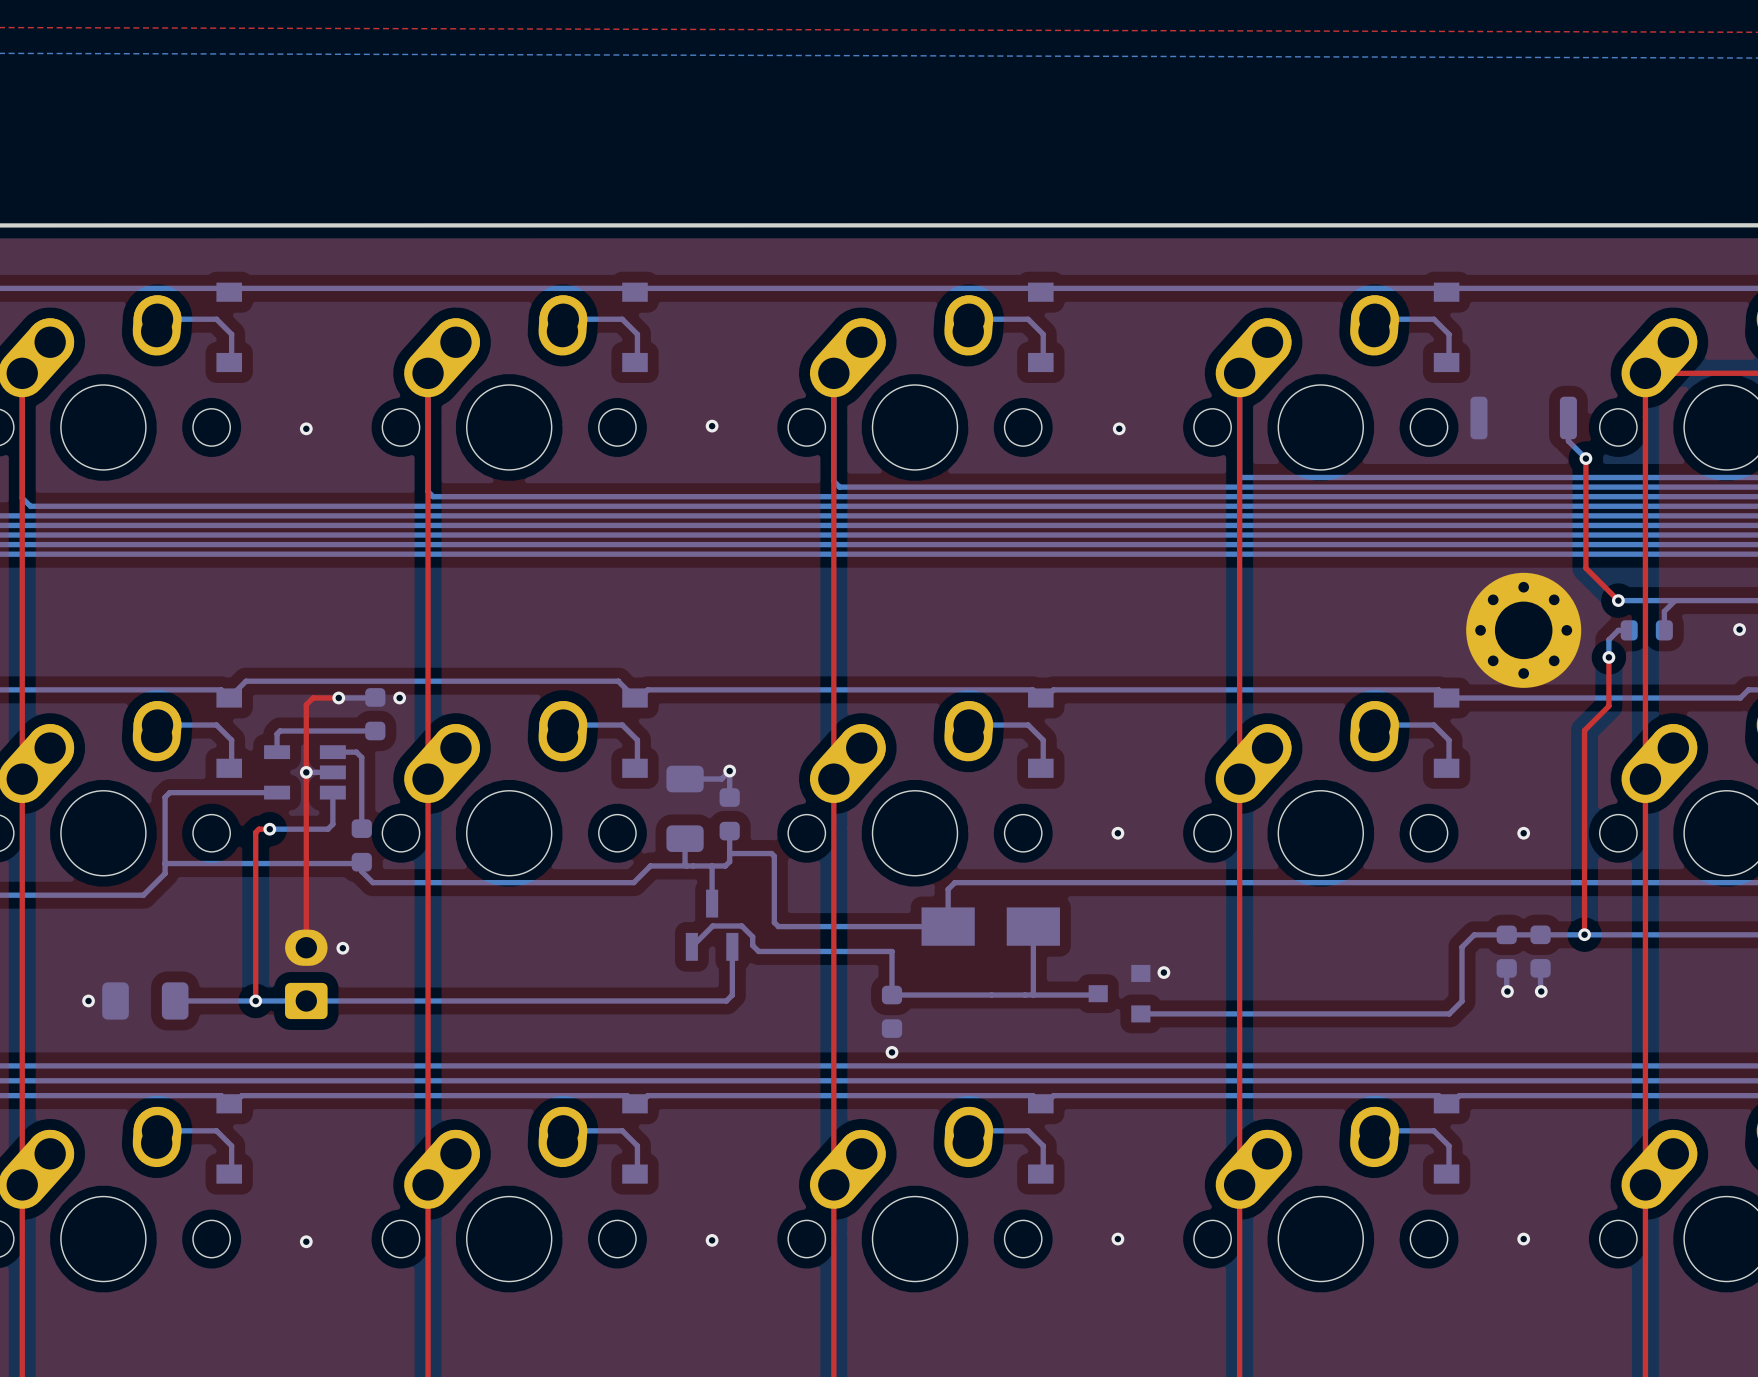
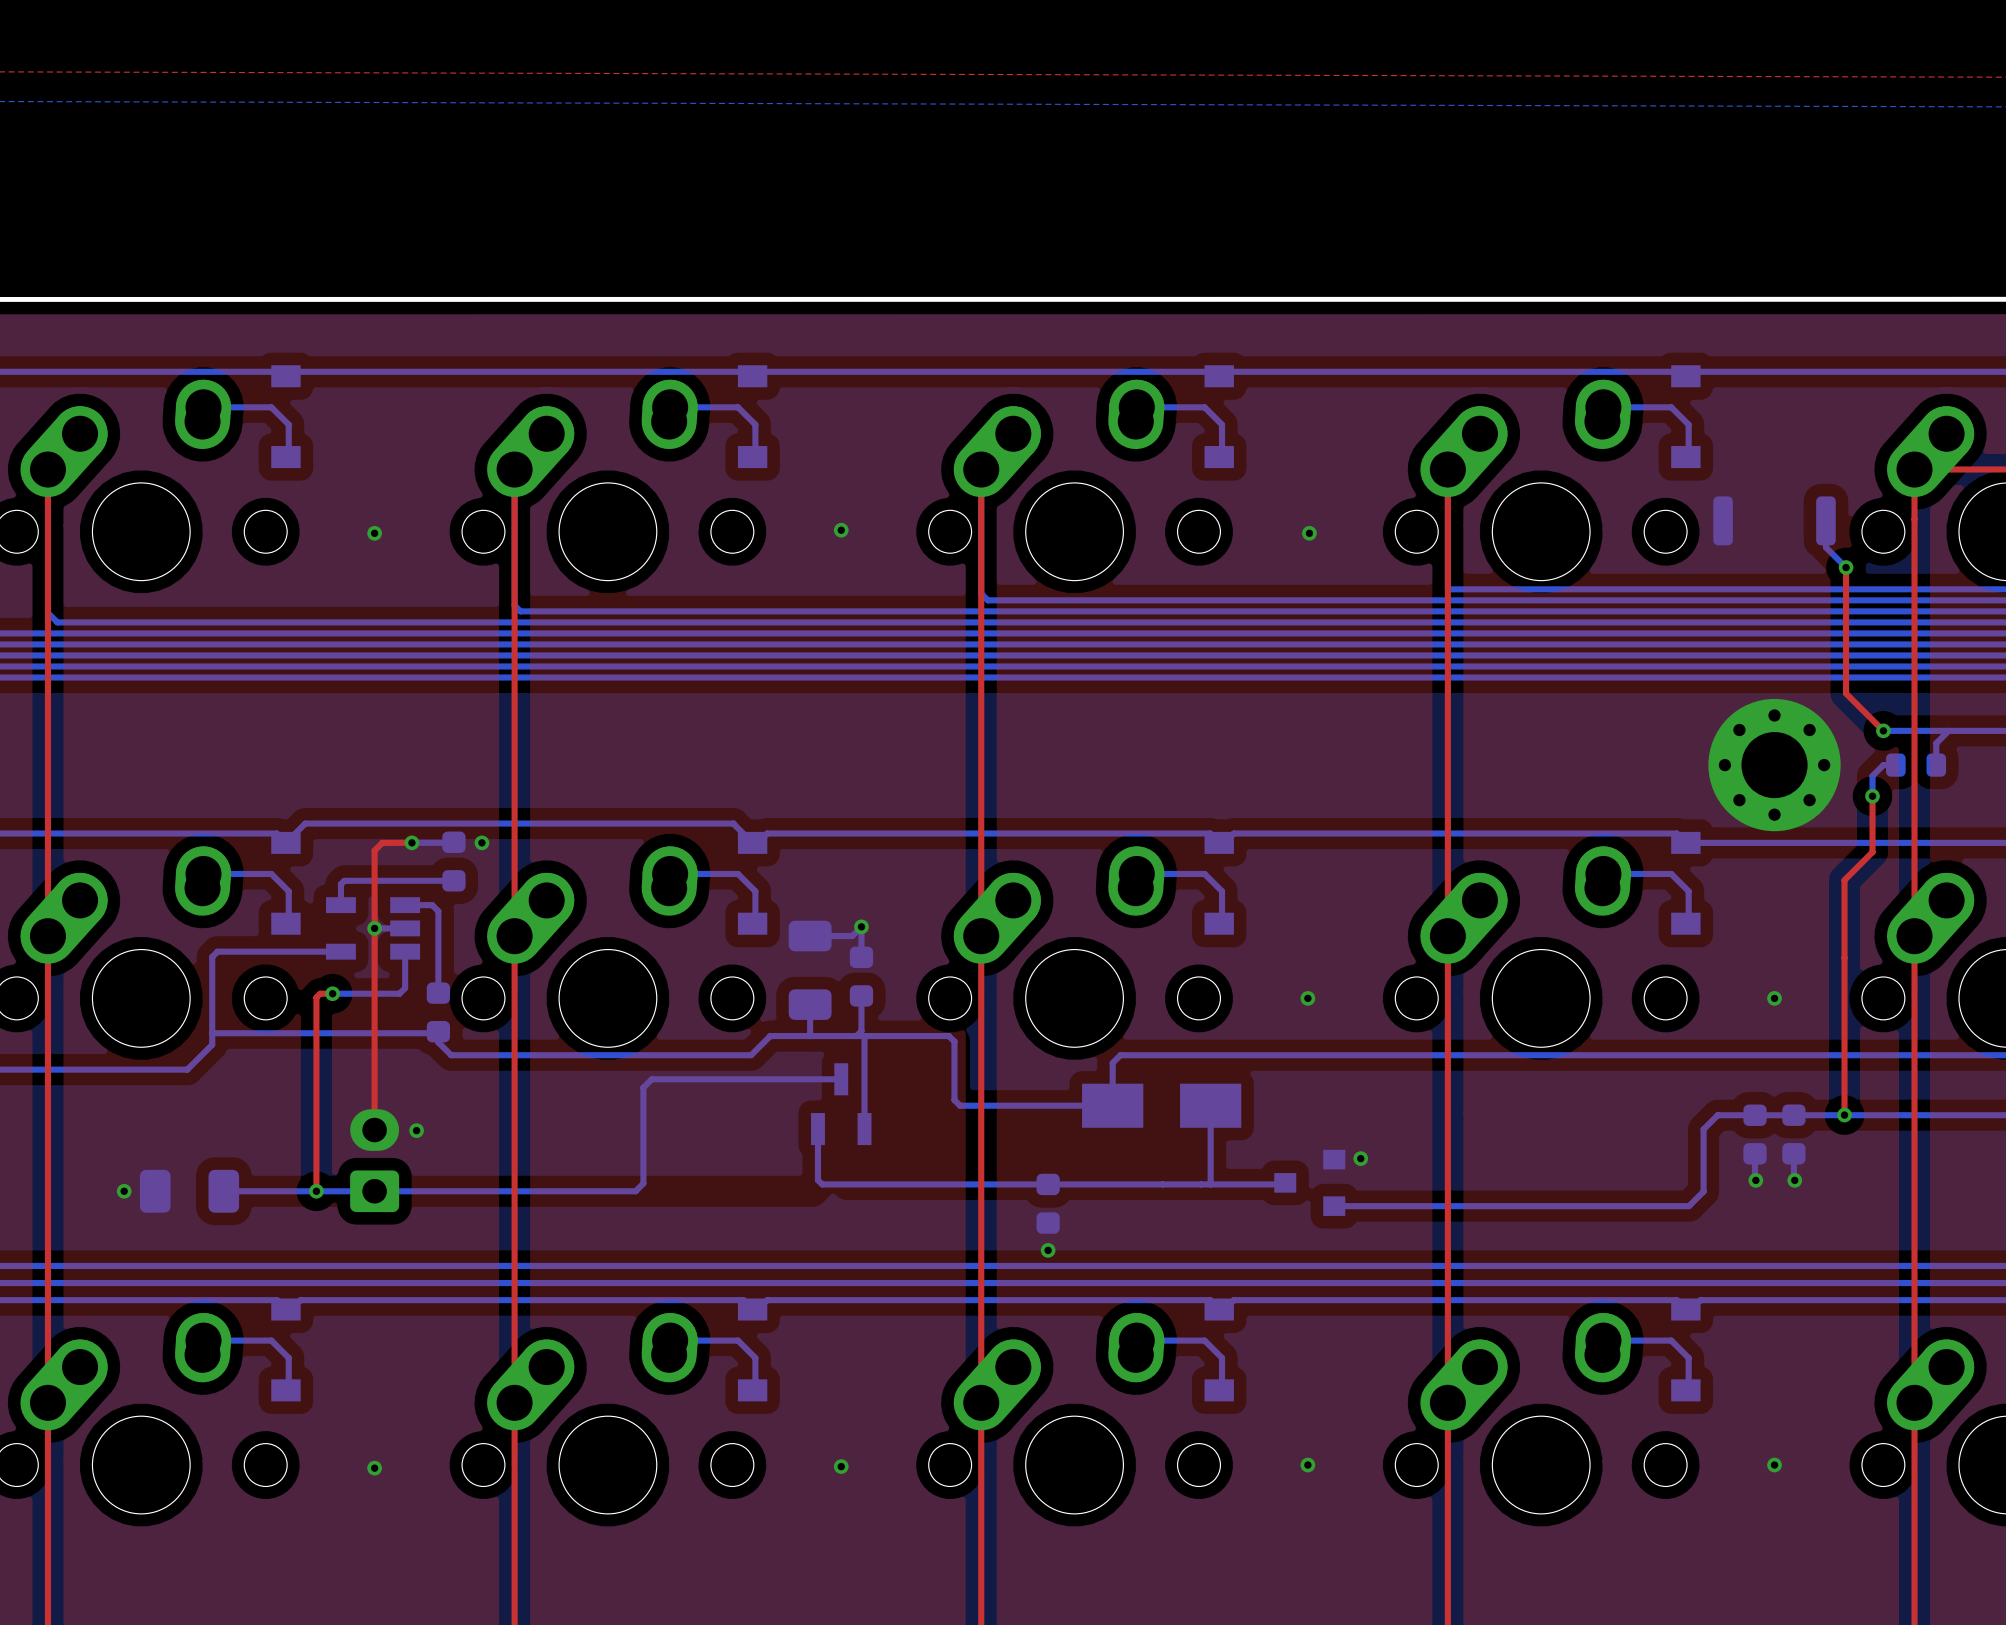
bottom track: (729, 853) (771, 853) (774, 856) (774, 922) (778, 926) (815, 926) -> (856, 1036) (948, 1036) (954, 1041) (954, 1100) (960, 1105)
bottom track: (712, 865) (712, 903) -> none
bottom track: none -> (864, 1036) (864, 1129)
bottom track: (691, 946) (712, 926) (741, 926) (752, 936) (752, 945) (758, 951) (892, 951) (892, 995) -> (817, 1129) (817, 1180) (822, 1184) (1048, 1184)
bottom track: (732, 946) (732, 995) (726, 1000) (533, 1000) -> (841, 1079) (651, 1079) (643, 1087) (643, 1183) (635, 1191)

